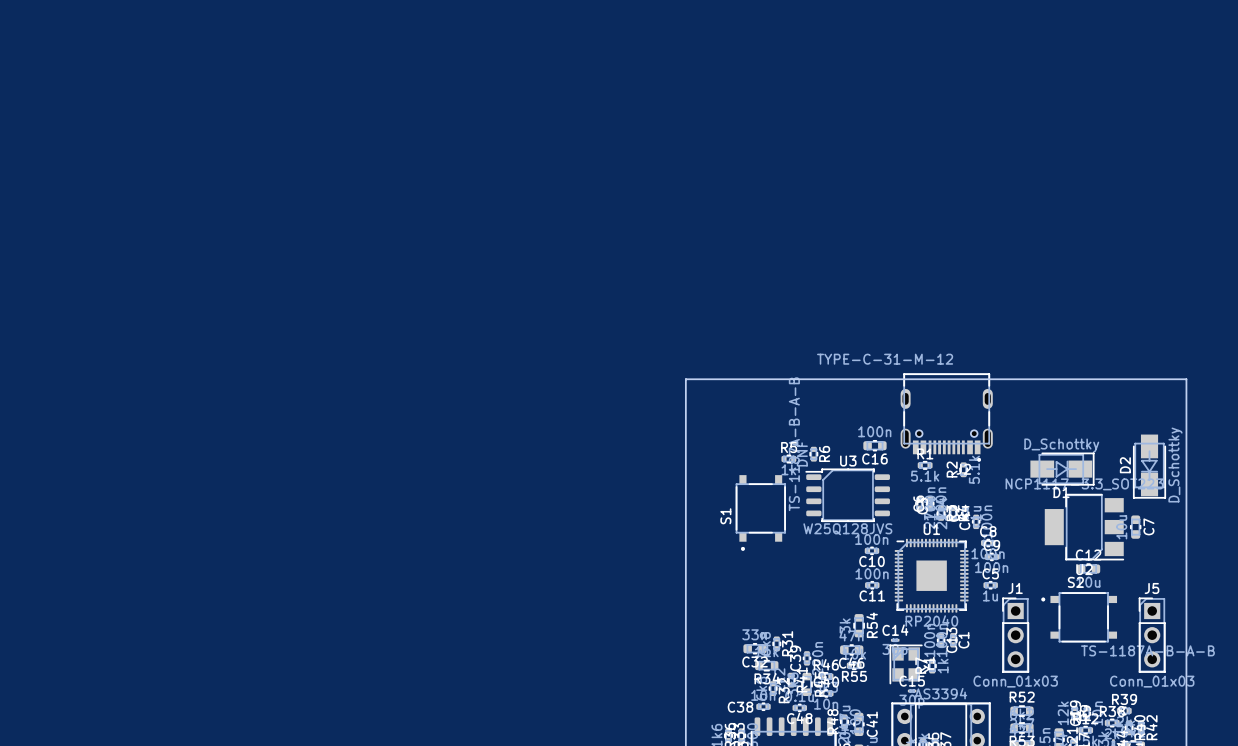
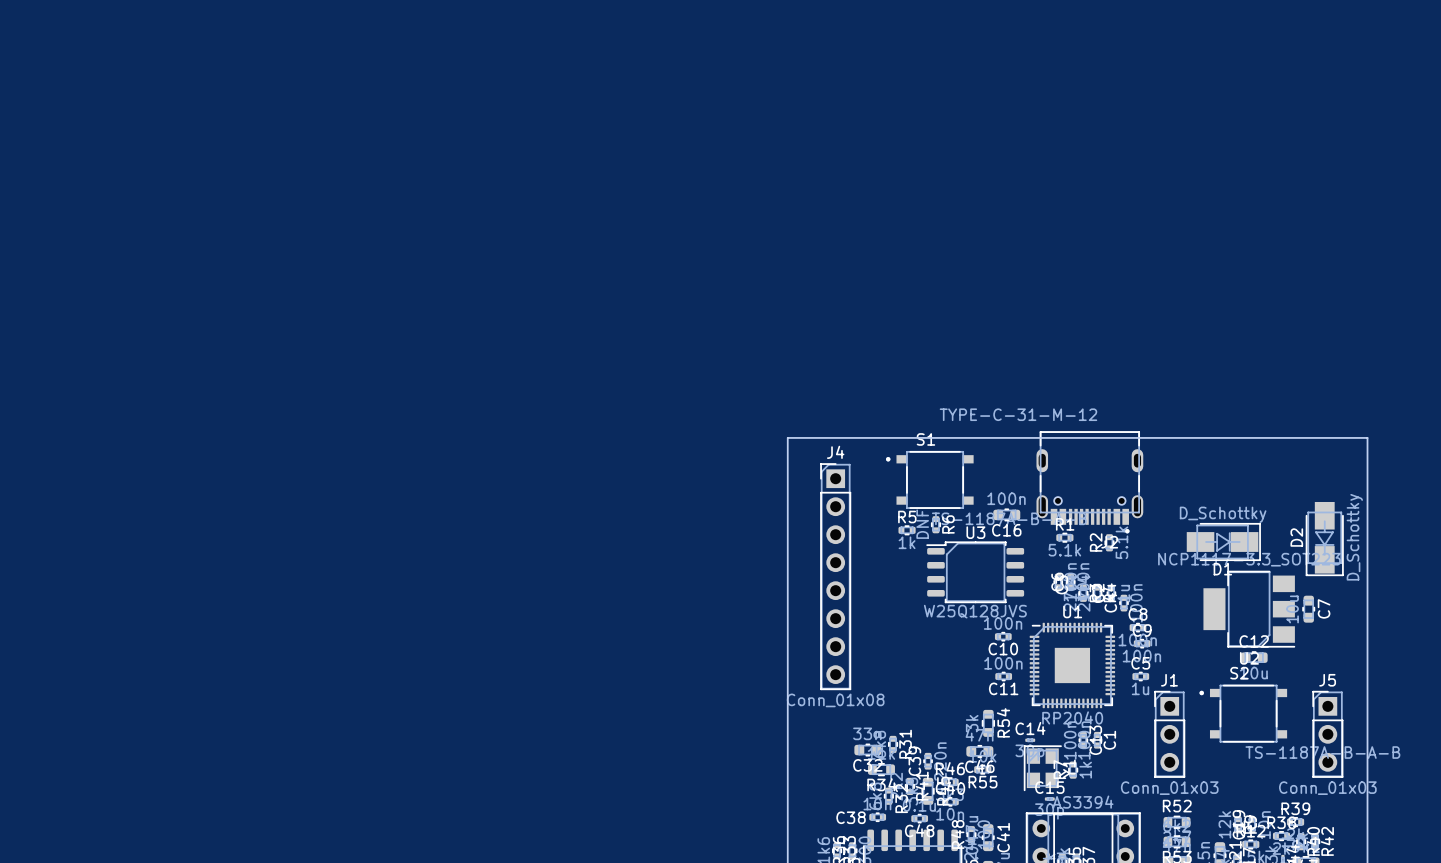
J4: none -> Conn_01x08 (835, 576)
S1 rotation: 0° (760, 512) -> 90° clockwise (929, 479)
S1 position: (760, 512) -> (929, 479)

